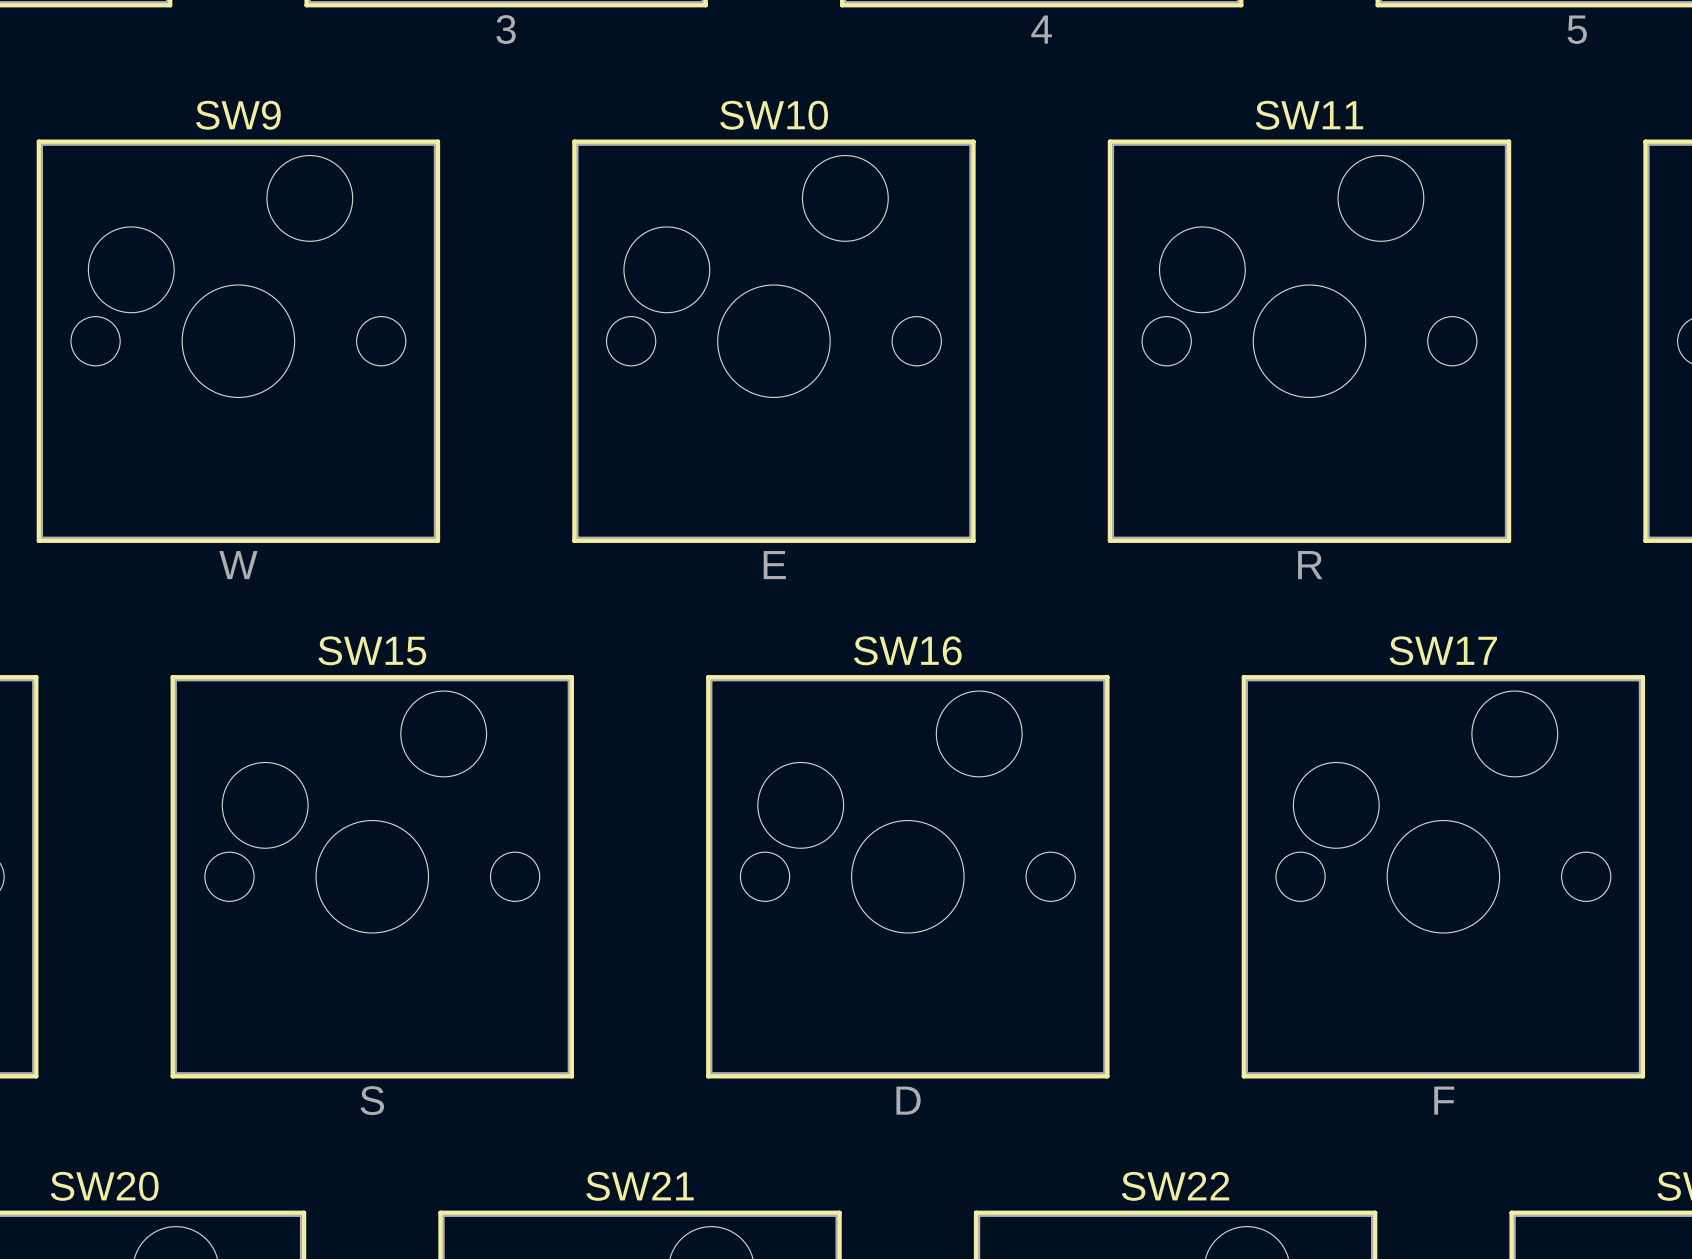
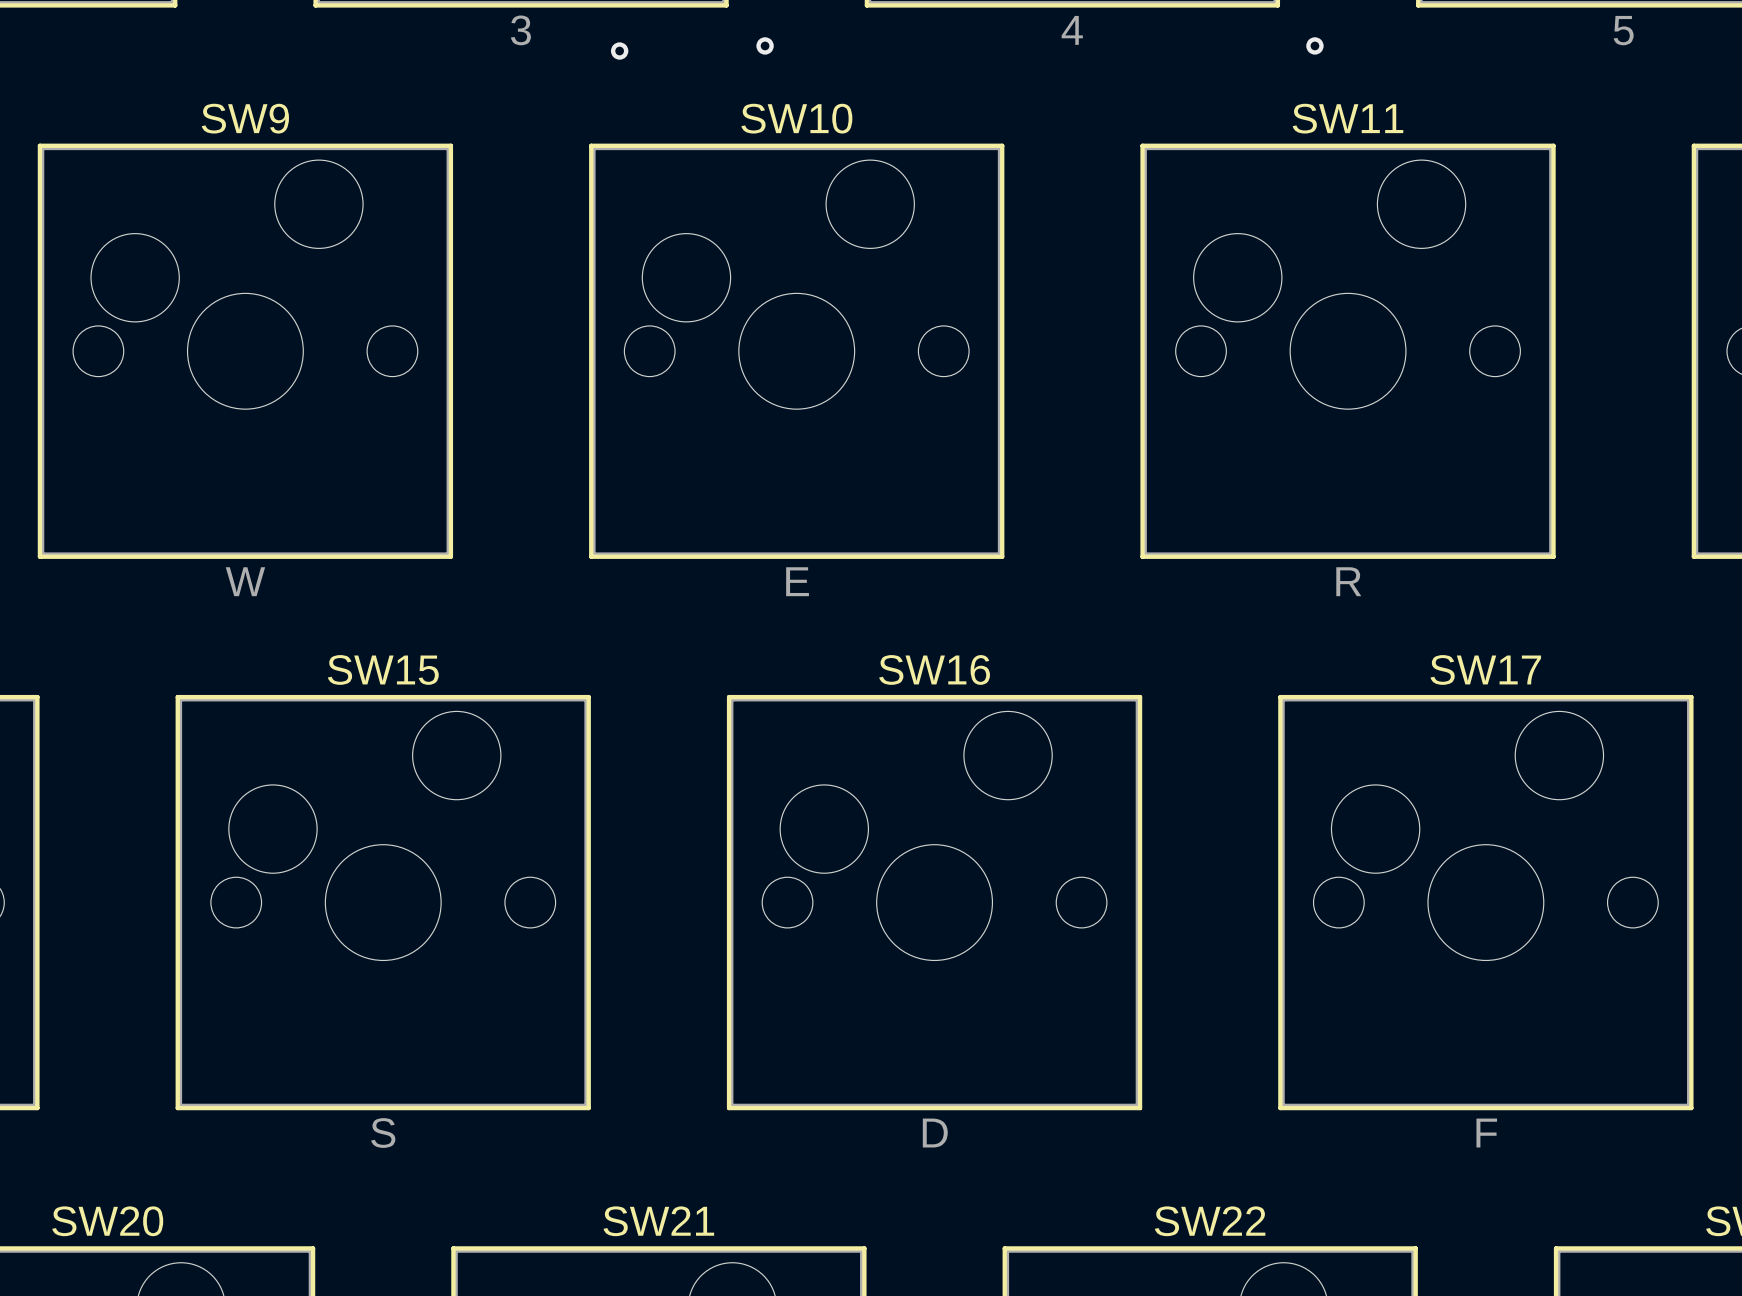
via: none -> (765, 45)
via: none -> (1314, 45)
via: none -> (619, 51)

